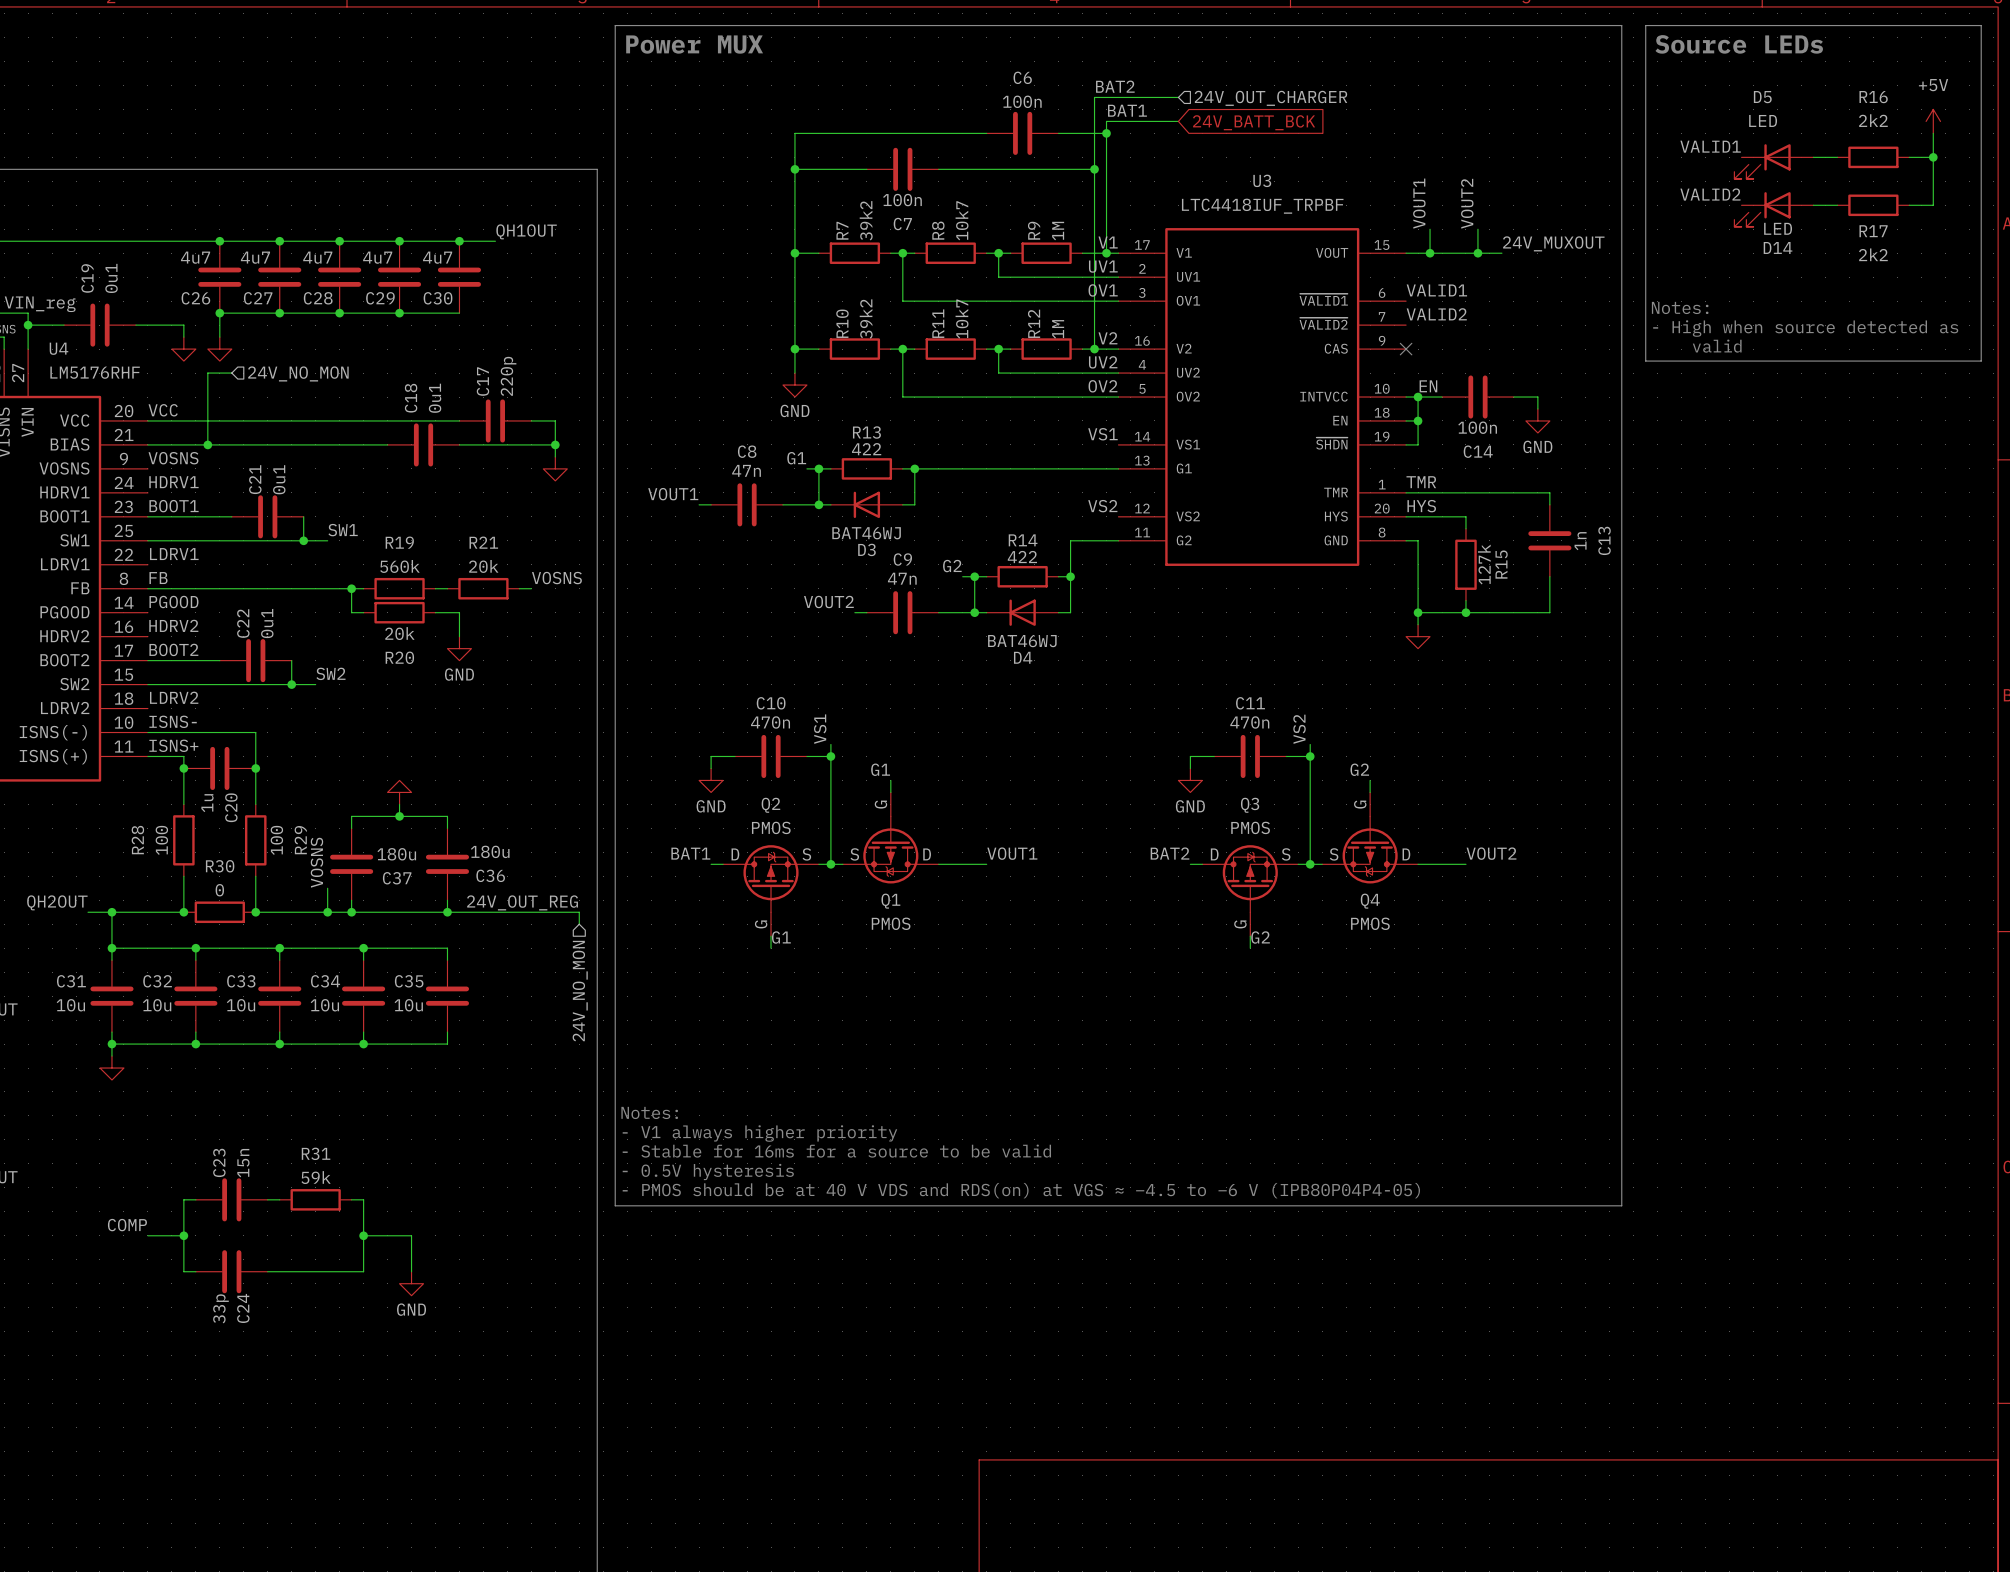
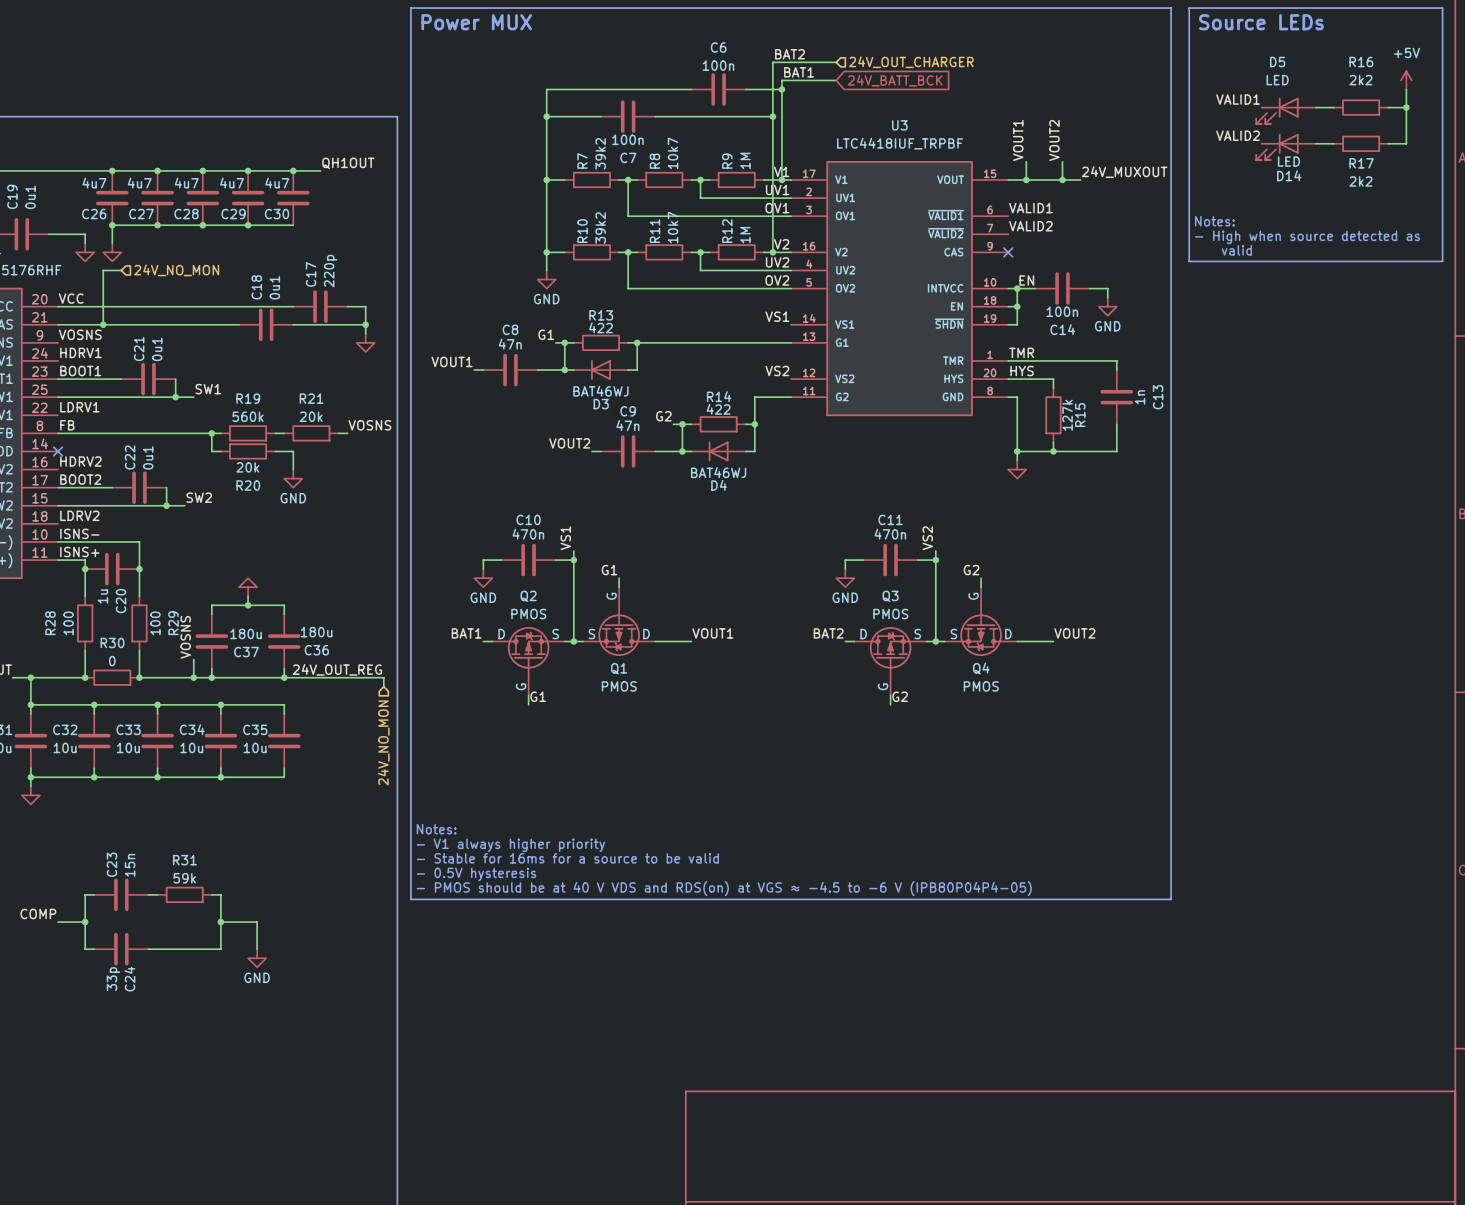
label: PGOOD (173, 602) -> none
no-connect mark: none -> (58, 451)

